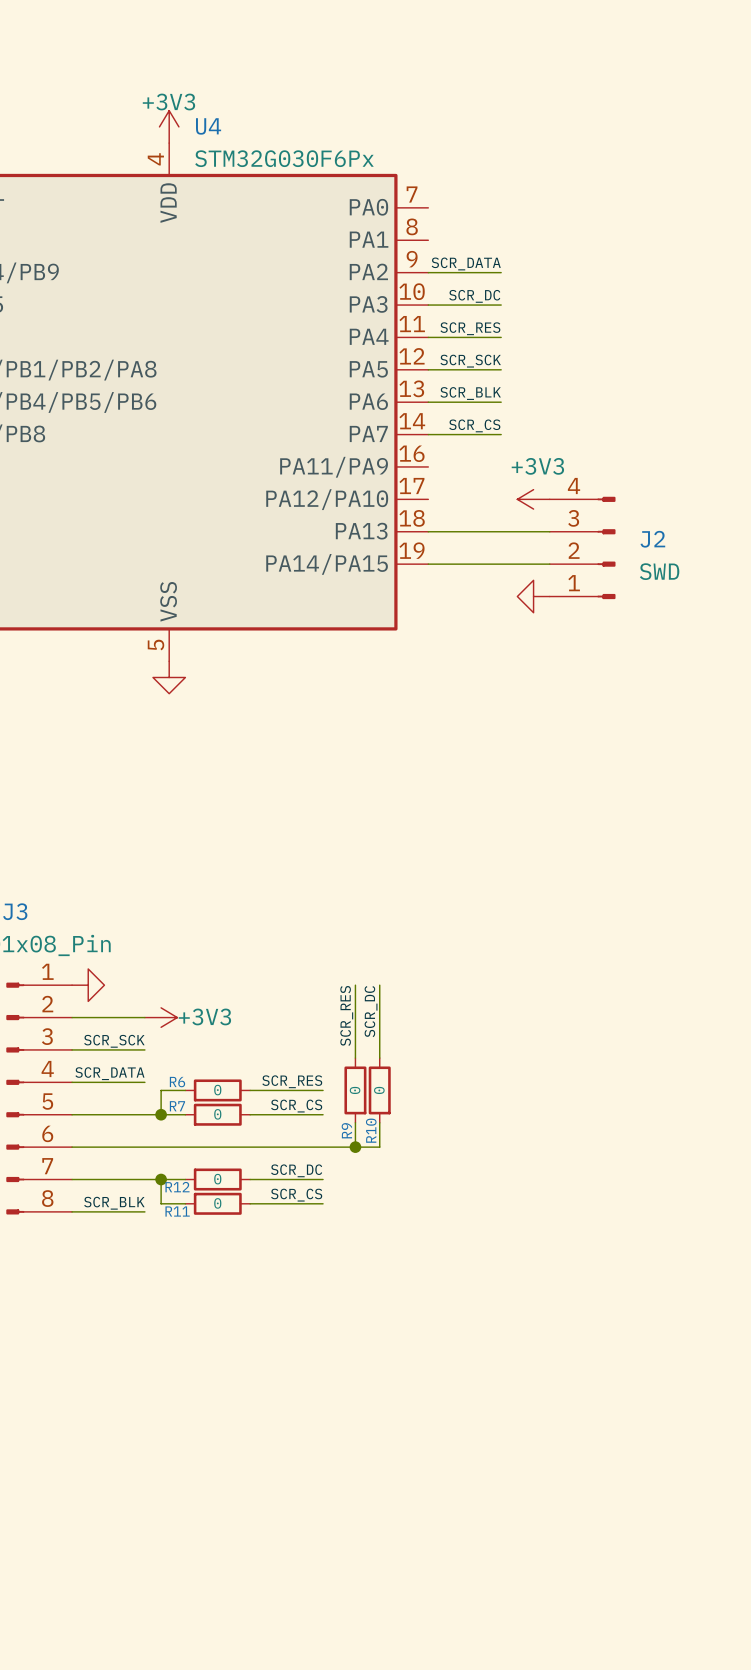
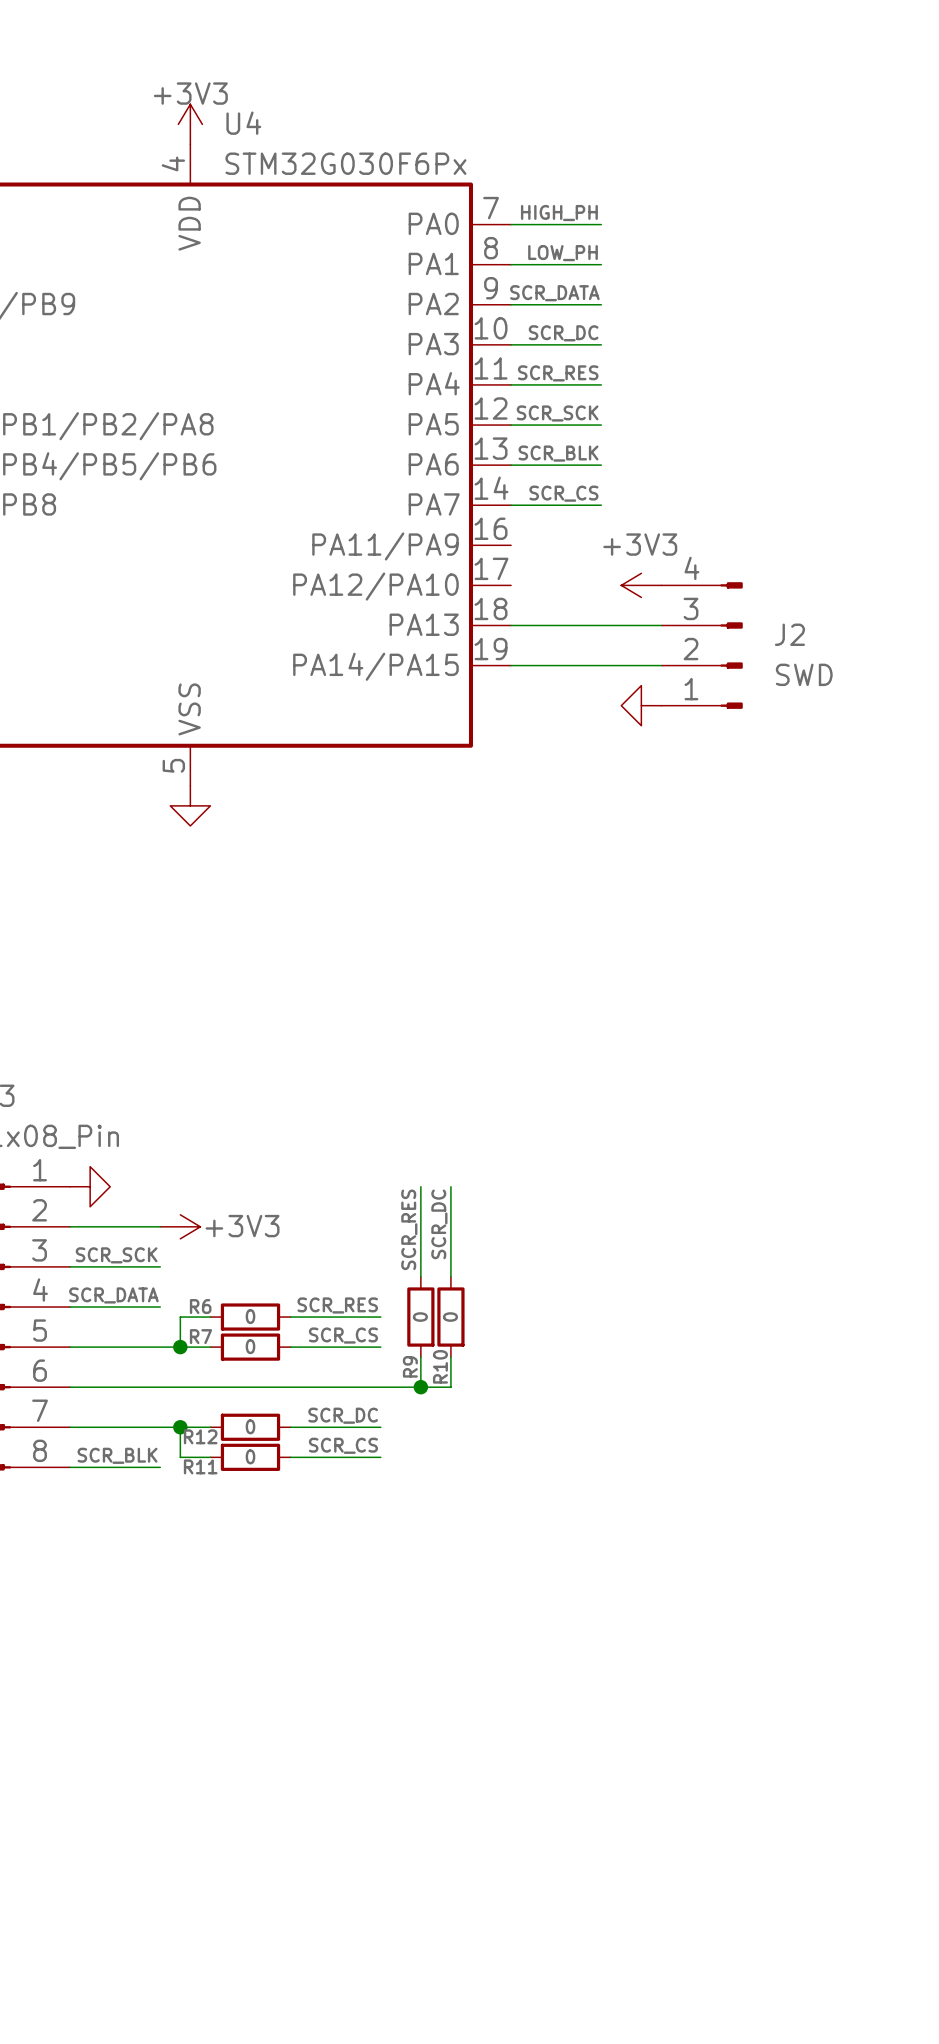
label: none -> HIGH_PH (559, 213)
wire: none -> (511, 224) (601, 224)
label: none -> LOW_PH (563, 253)
wire: none -> (511, 264) (601, 264)

